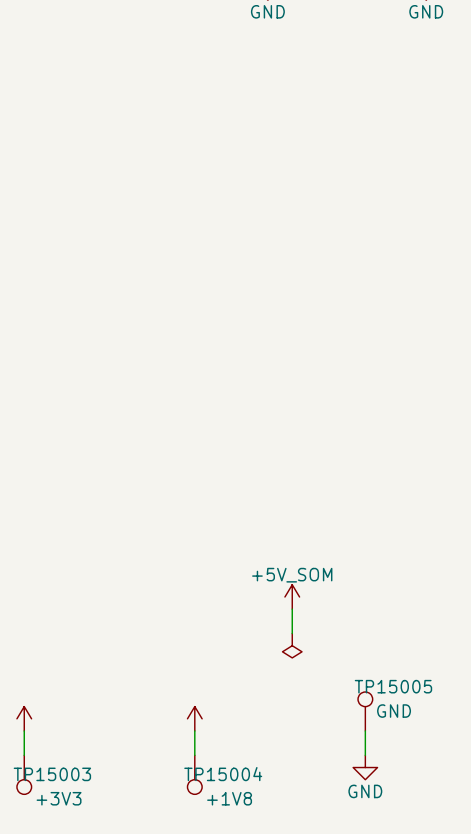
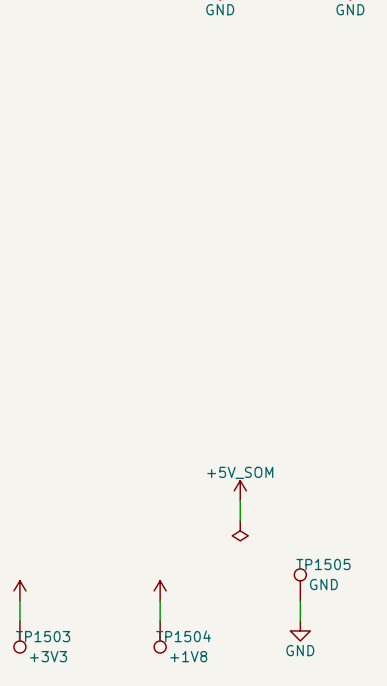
TP15005 name: TP15005 (393, 686) -> TP1505 (323, 564)
TP15003 name: TP15003 (52, 774) -> TP1503 (43, 636)
TP15004 name: TP15004 (223, 774) -> TP1504 (183, 636)

